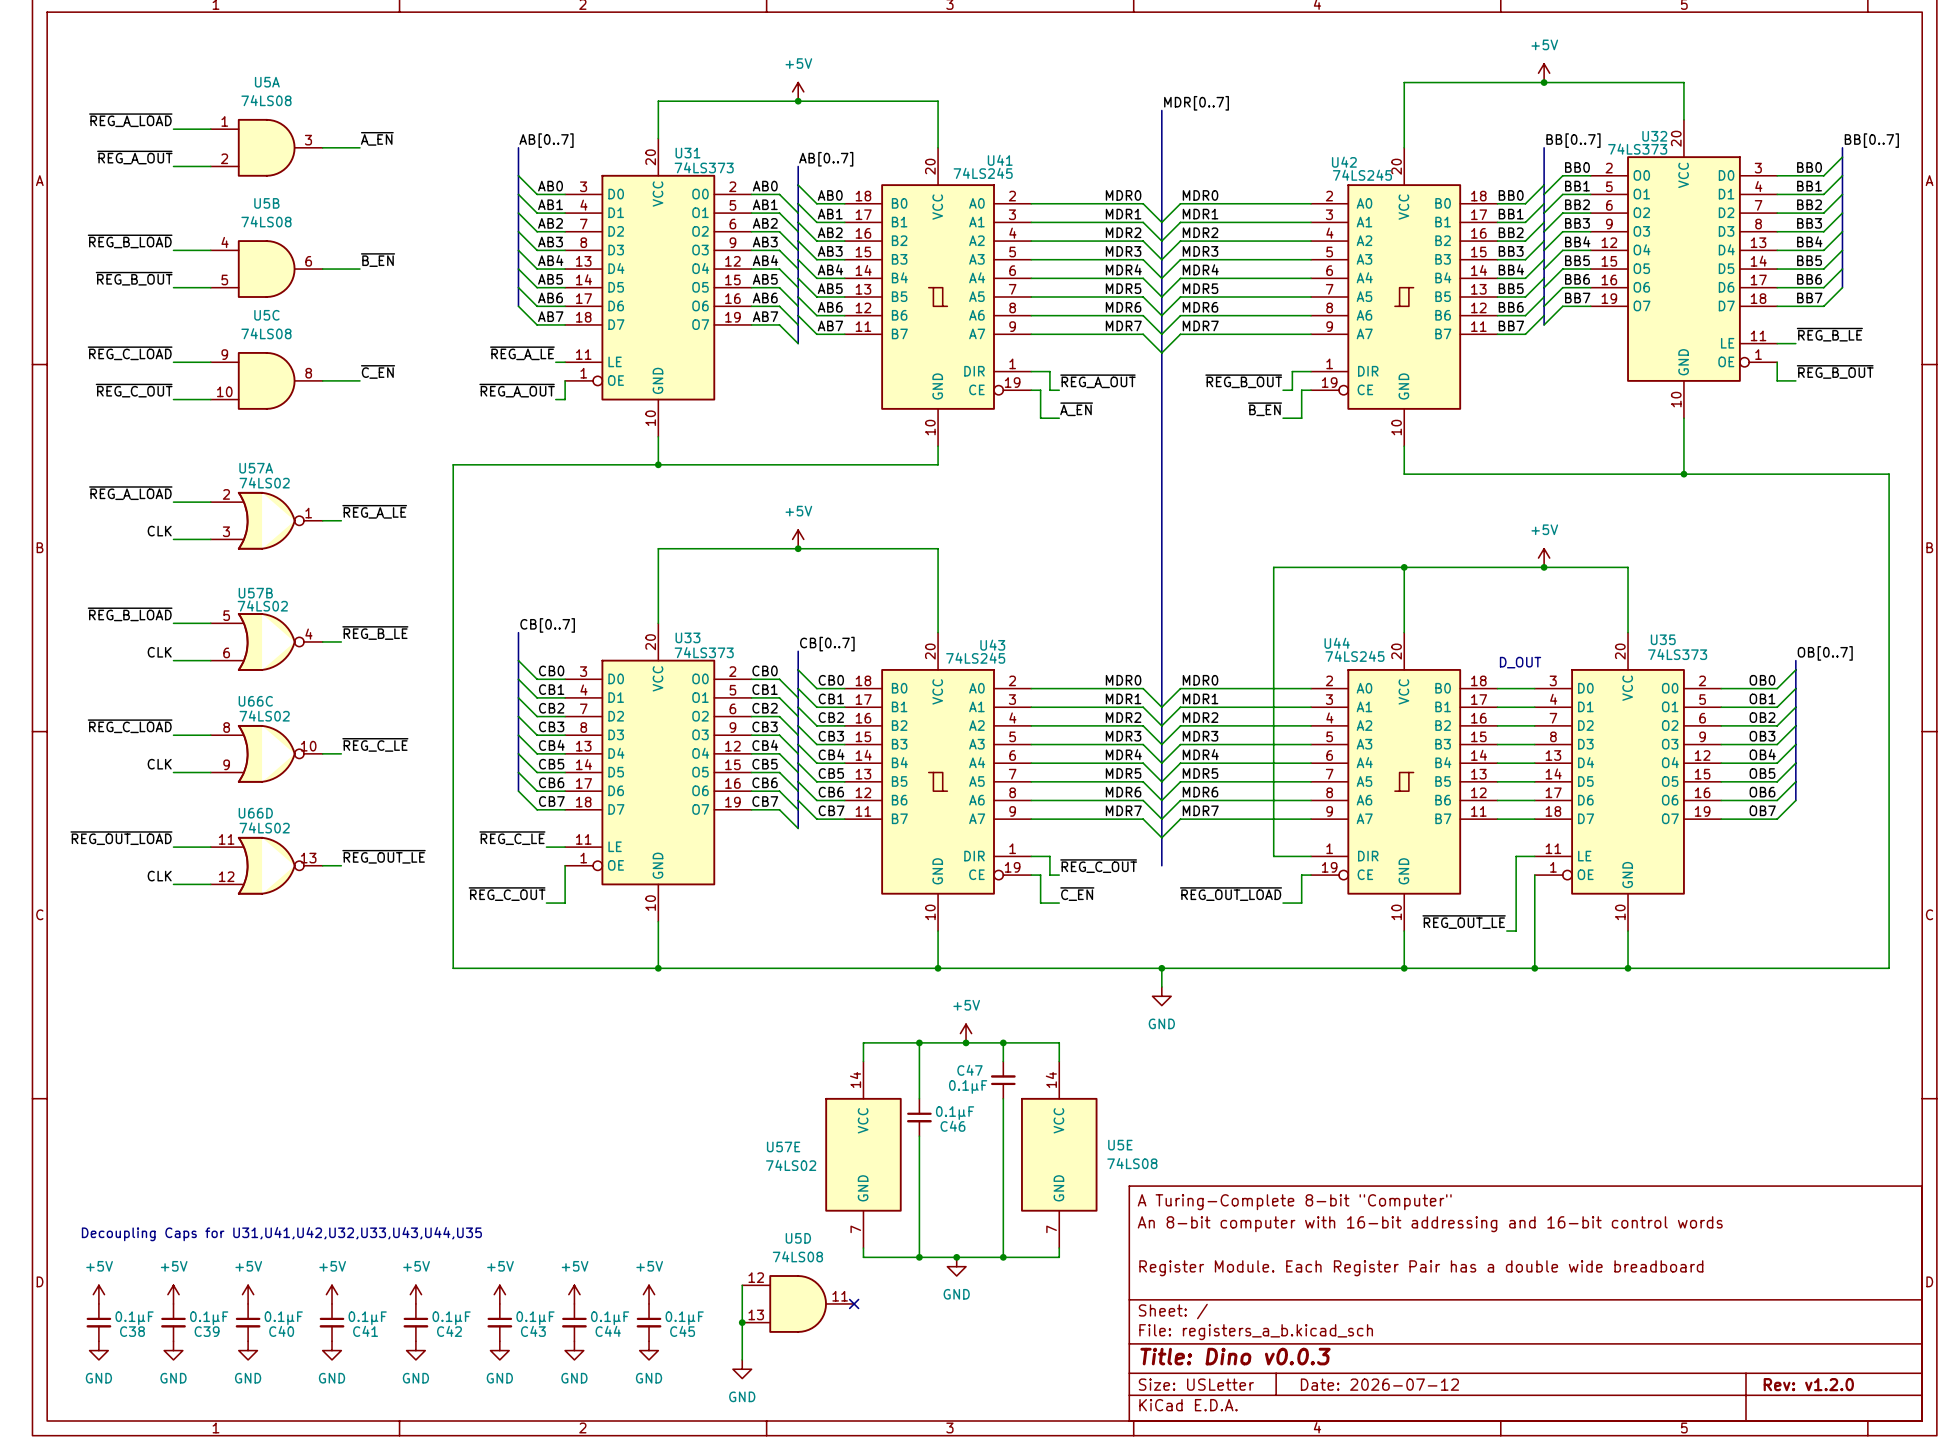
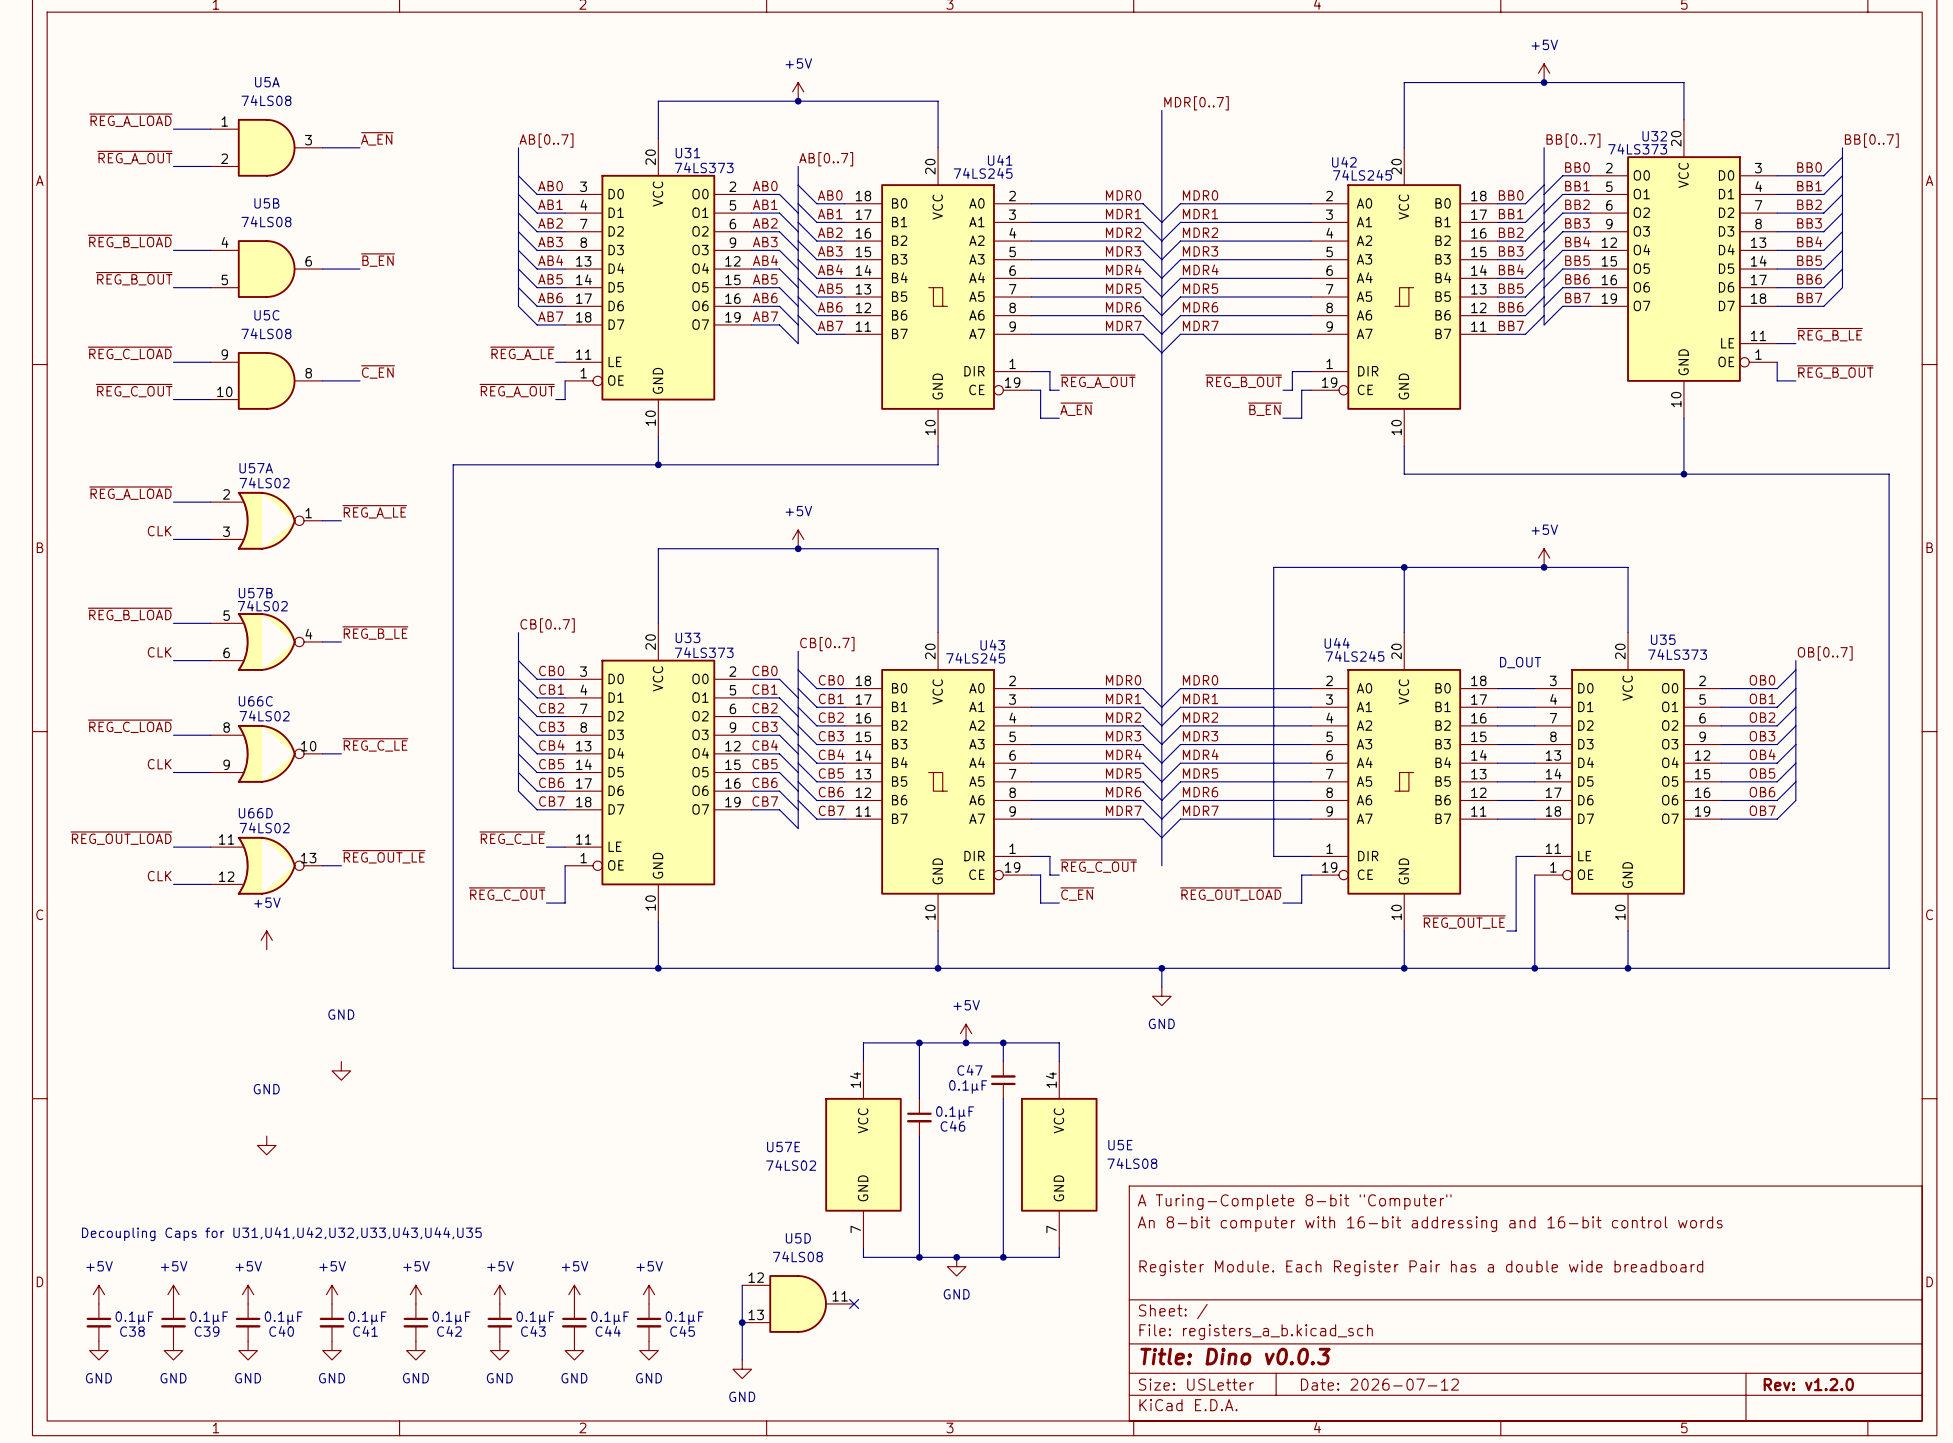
power symbol: none -> +5V (266, 940)
power symbol: none -> GND (341, 1070)
power symbol: none -> GND (266, 1145)

